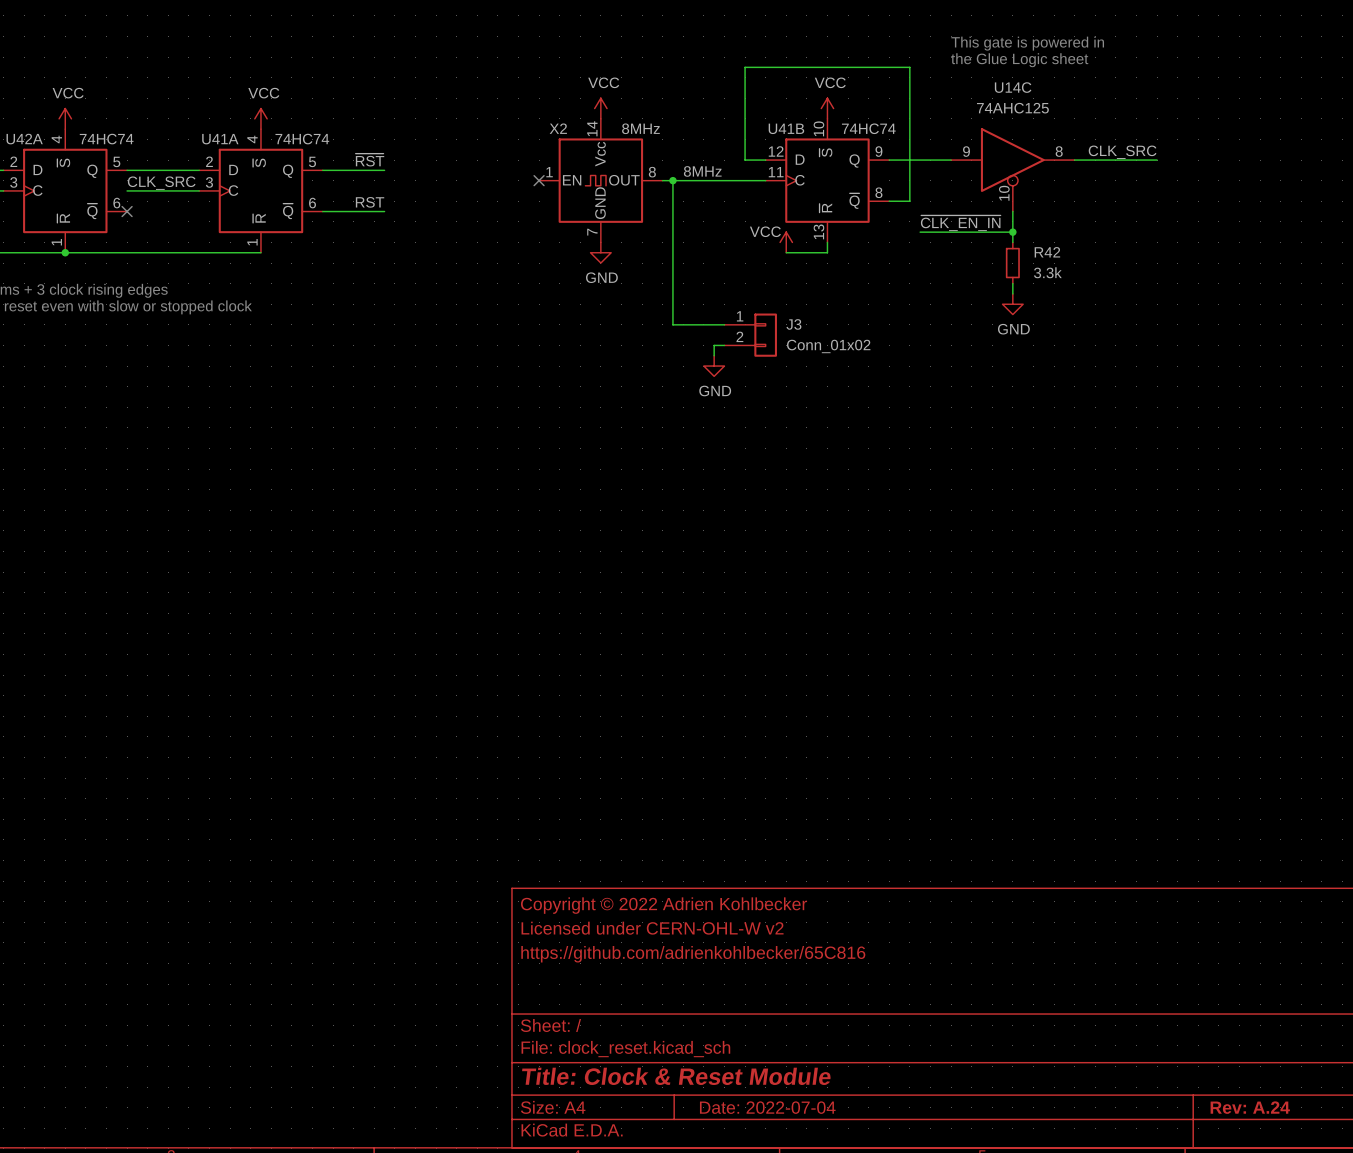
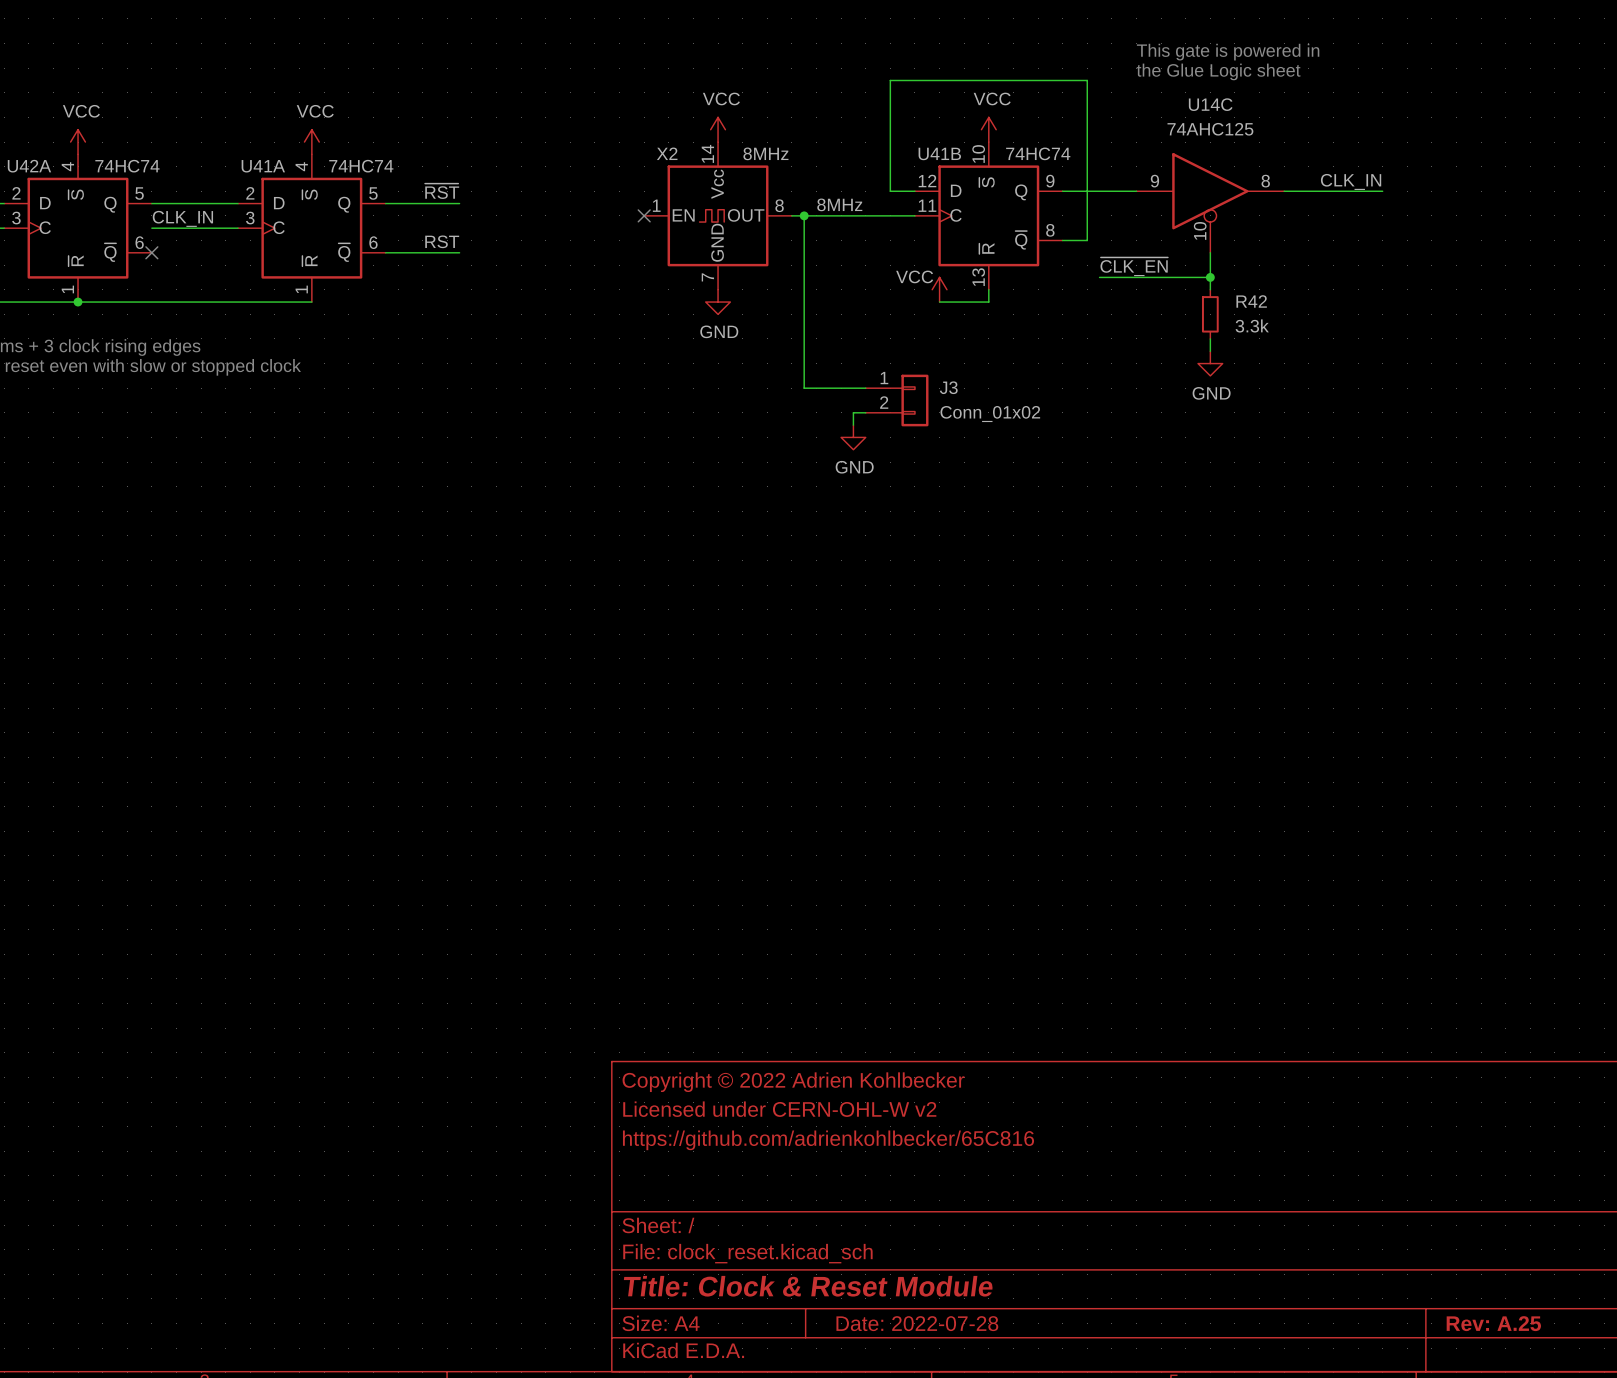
label: CLK_SRC (1122, 152) -> CLK_IN (1351, 181)
label: CLK_SRC (161, 183) -> CLK_IN (182, 218)
label: ~{CLK_EN_IN} (960, 223) -> ~{CLK_EN} (1134, 266)
title block: Date: 2022-07-04 (767, 1107) -> Date: 2022-07-28 (917, 1323)
title block: Rev: A.24 (1250, 1107) -> Rev: A.25 (1493, 1323)

